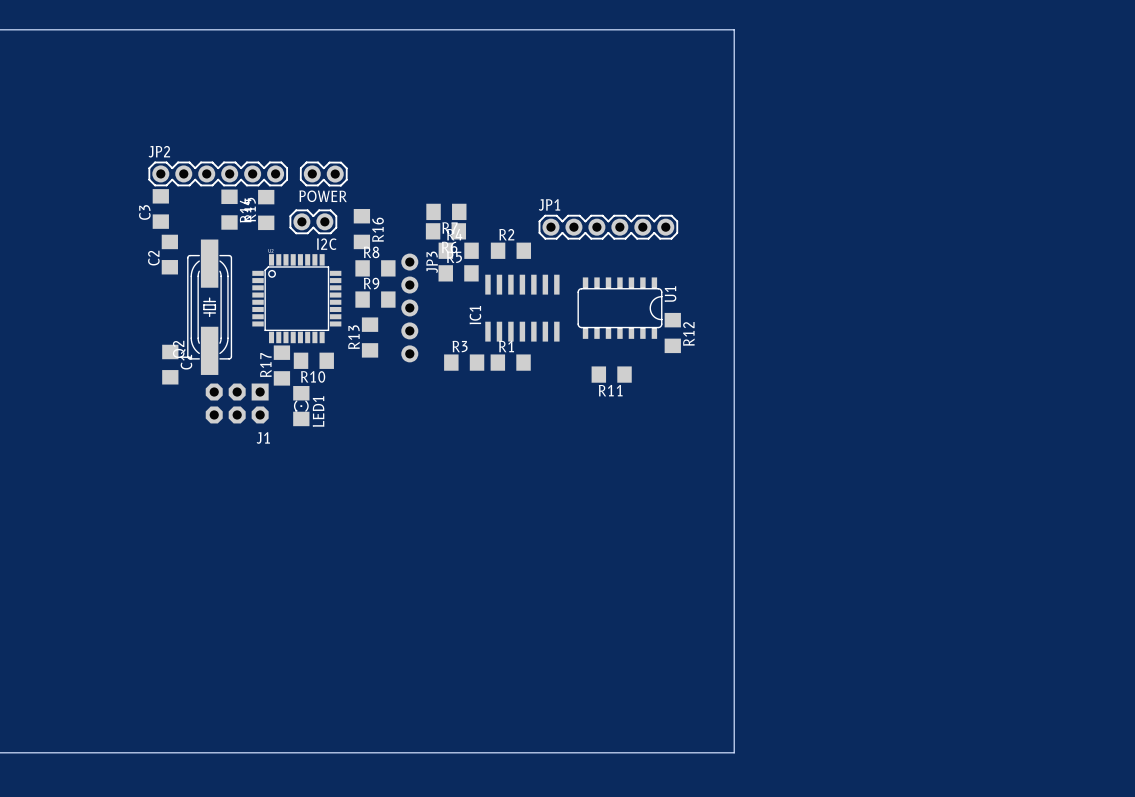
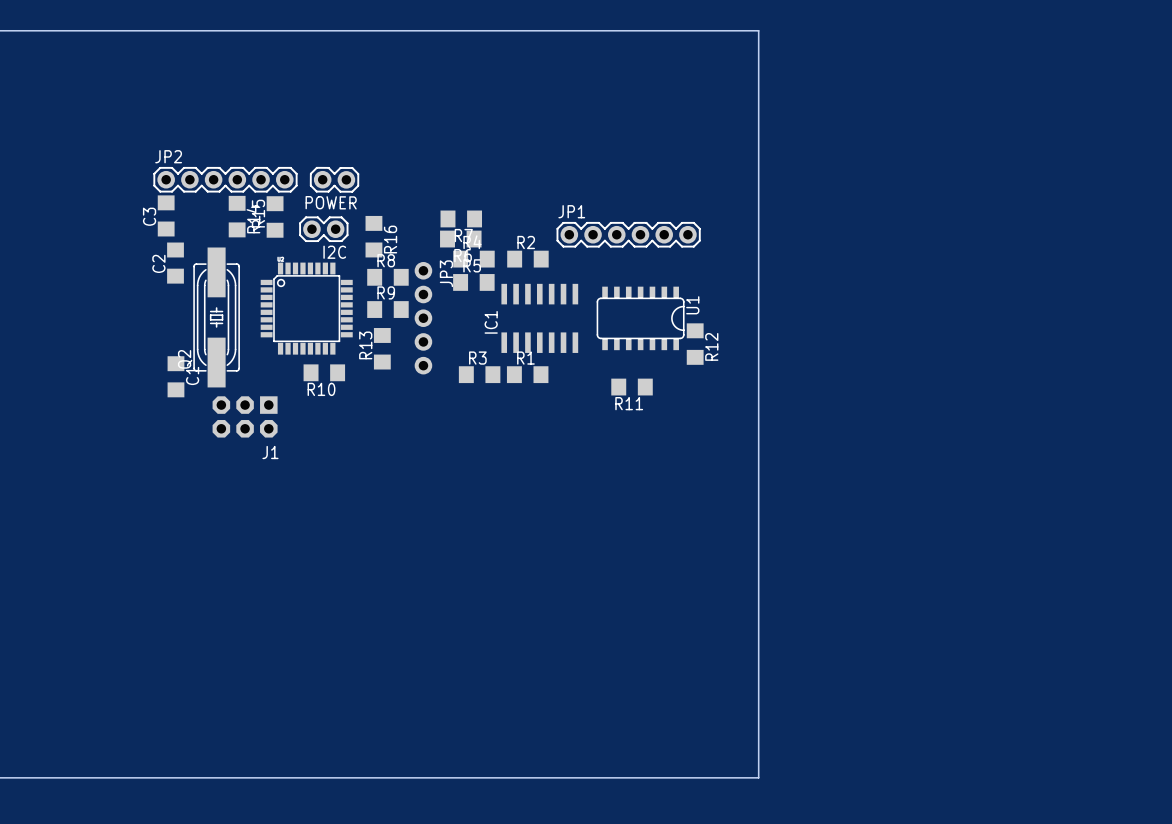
R17: (281, 365) -> none
LED1: (301, 406) -> none

